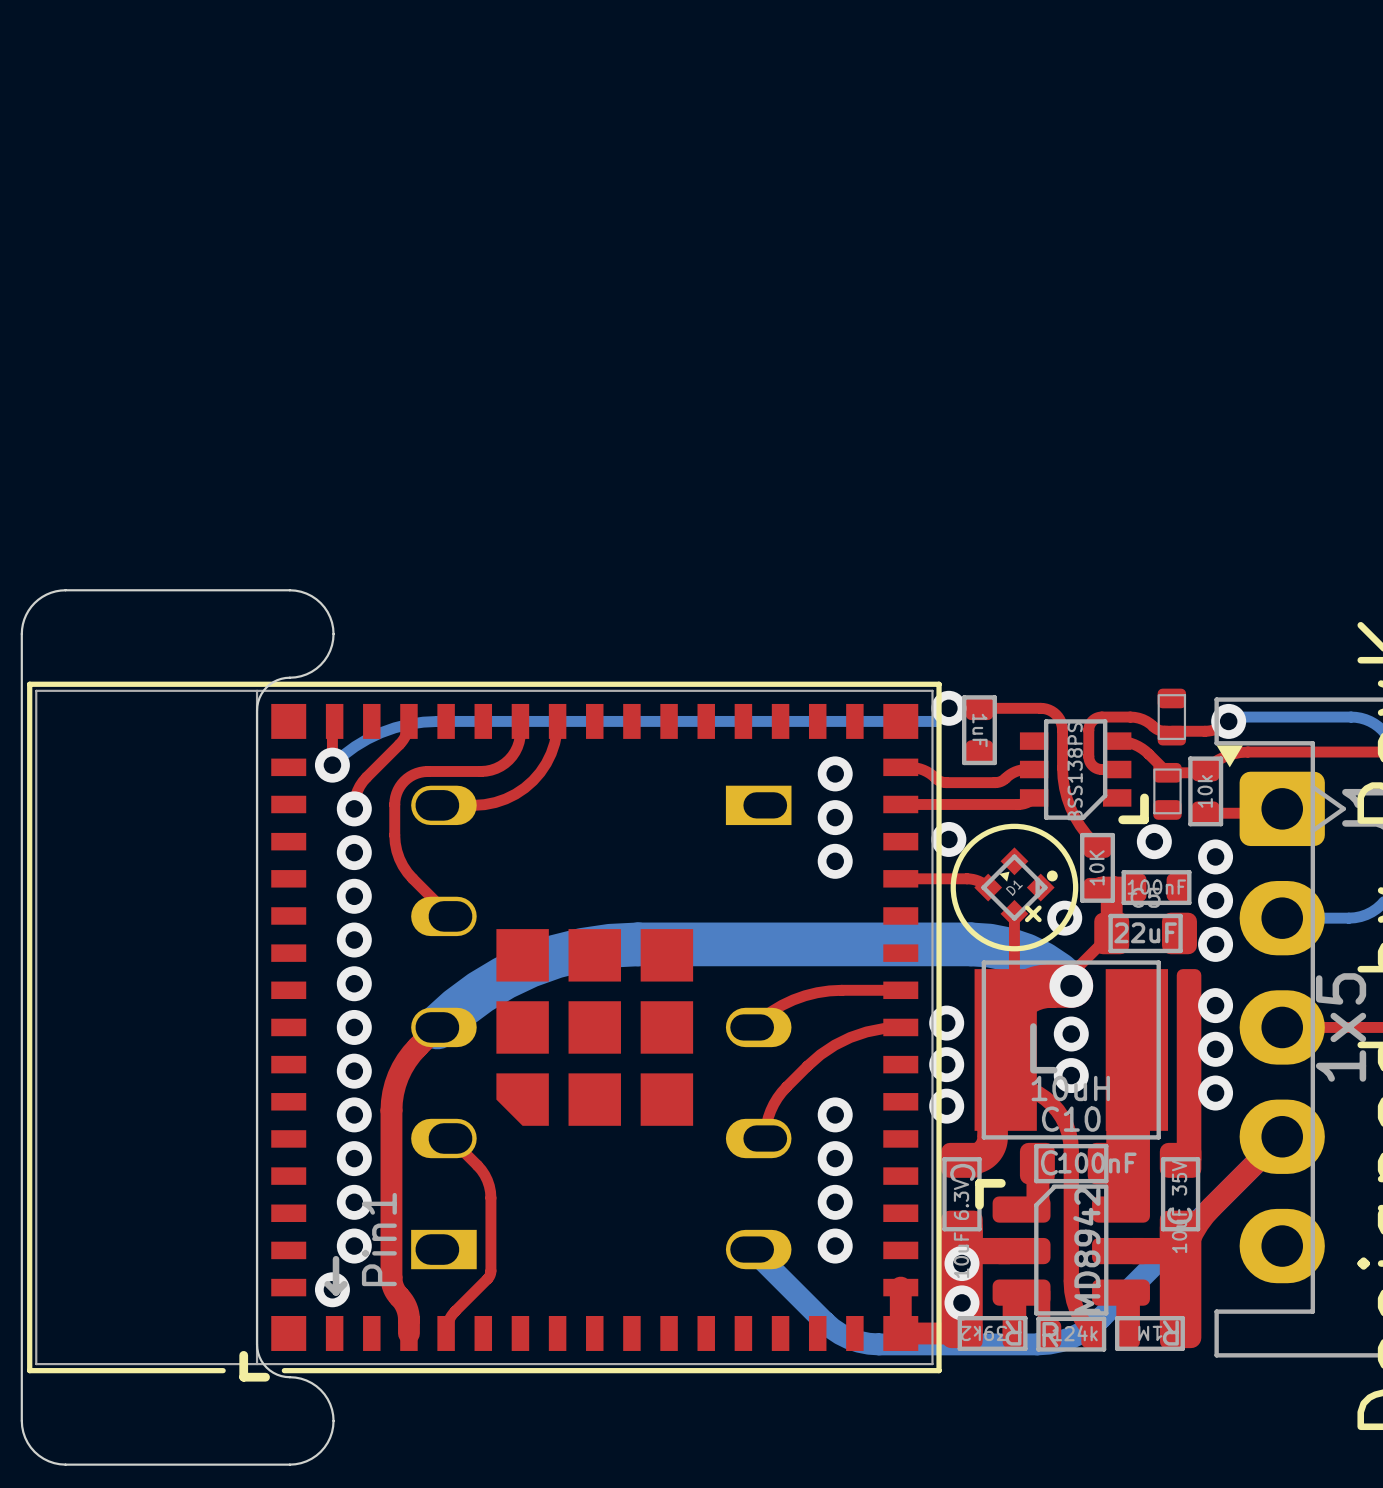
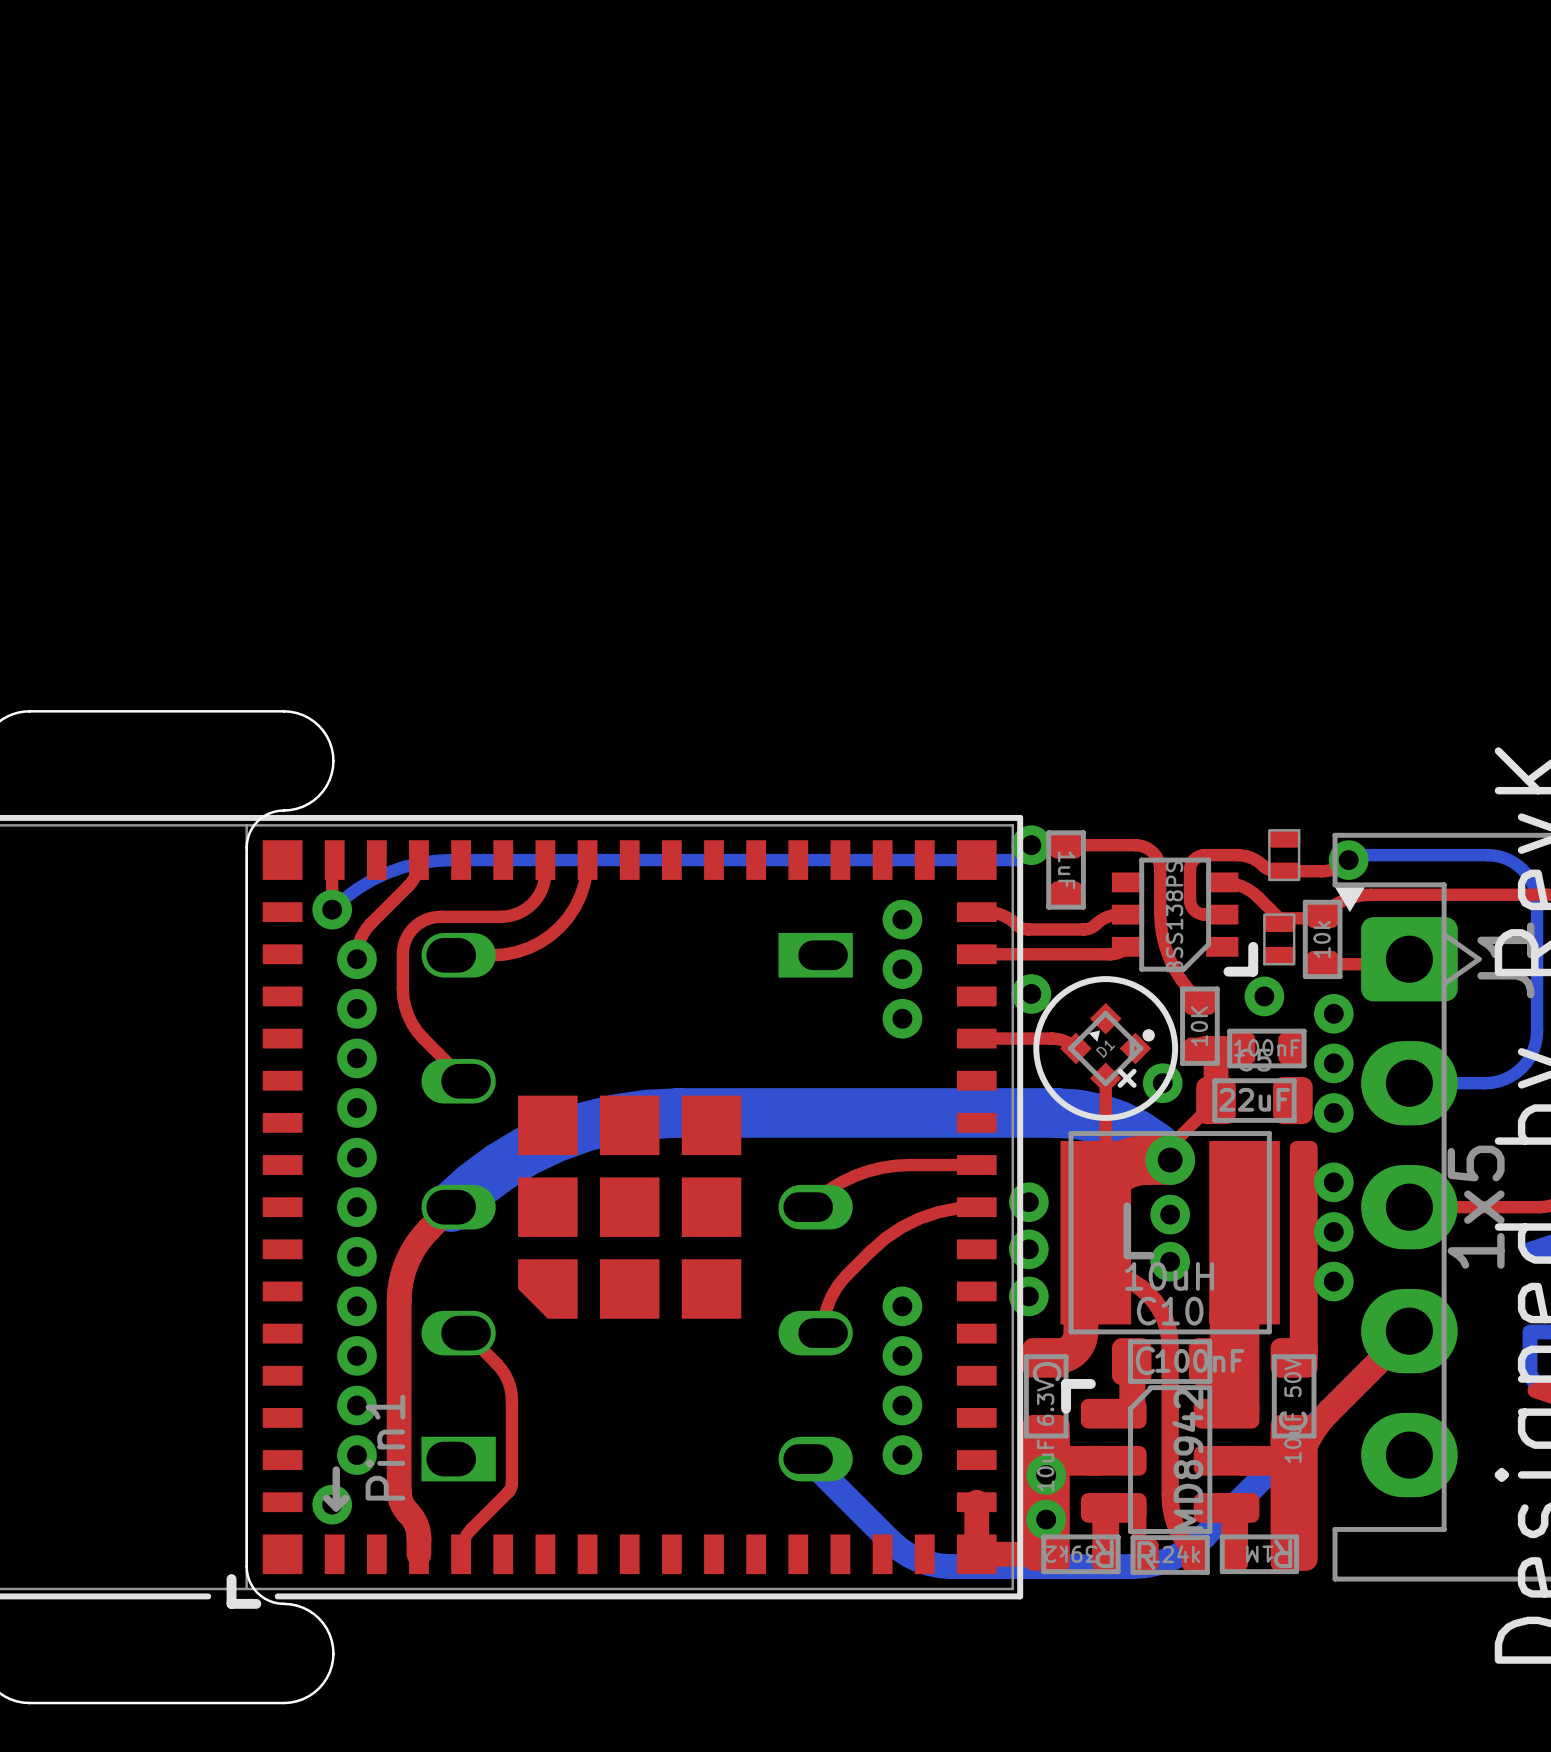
part footprint: [1157, 688, 1187, 746] -> [1268, 829, 1301, 882]
part footprint: [1153, 762, 1182, 820] -> [1263, 913, 1296, 966]
drawing shape: [1160, 1157, 1201, 1254] -> [1271, 1354, 1317, 1464]

